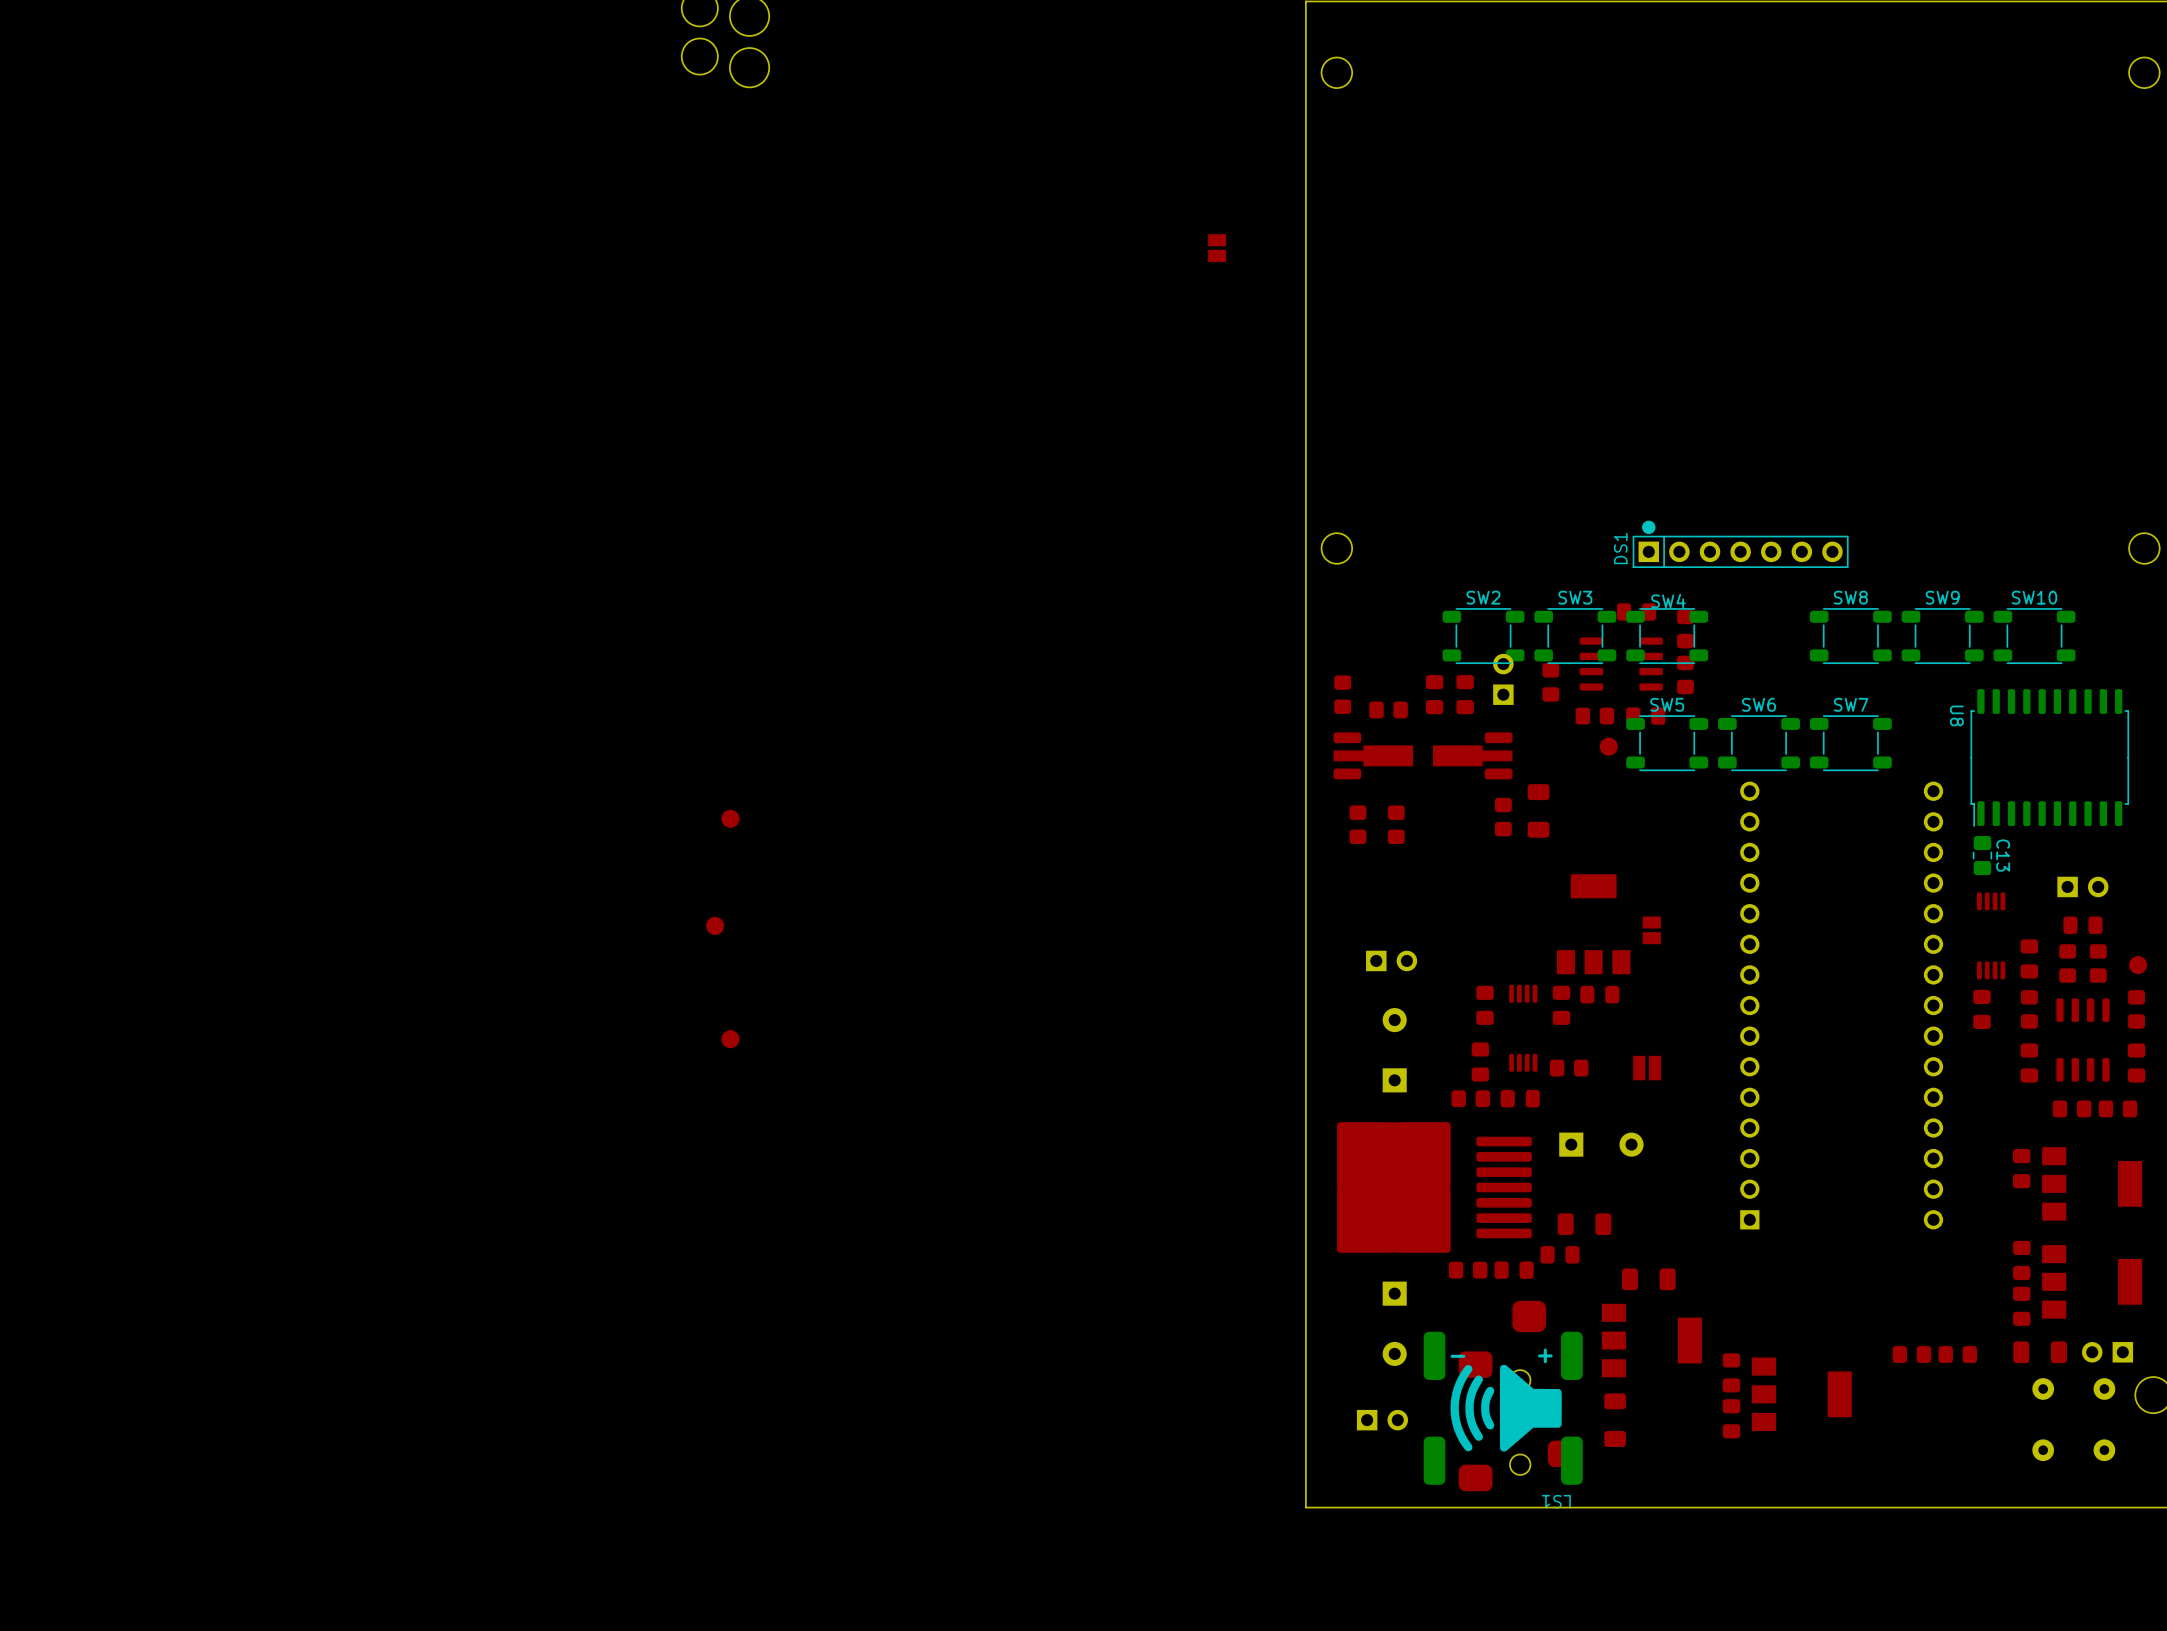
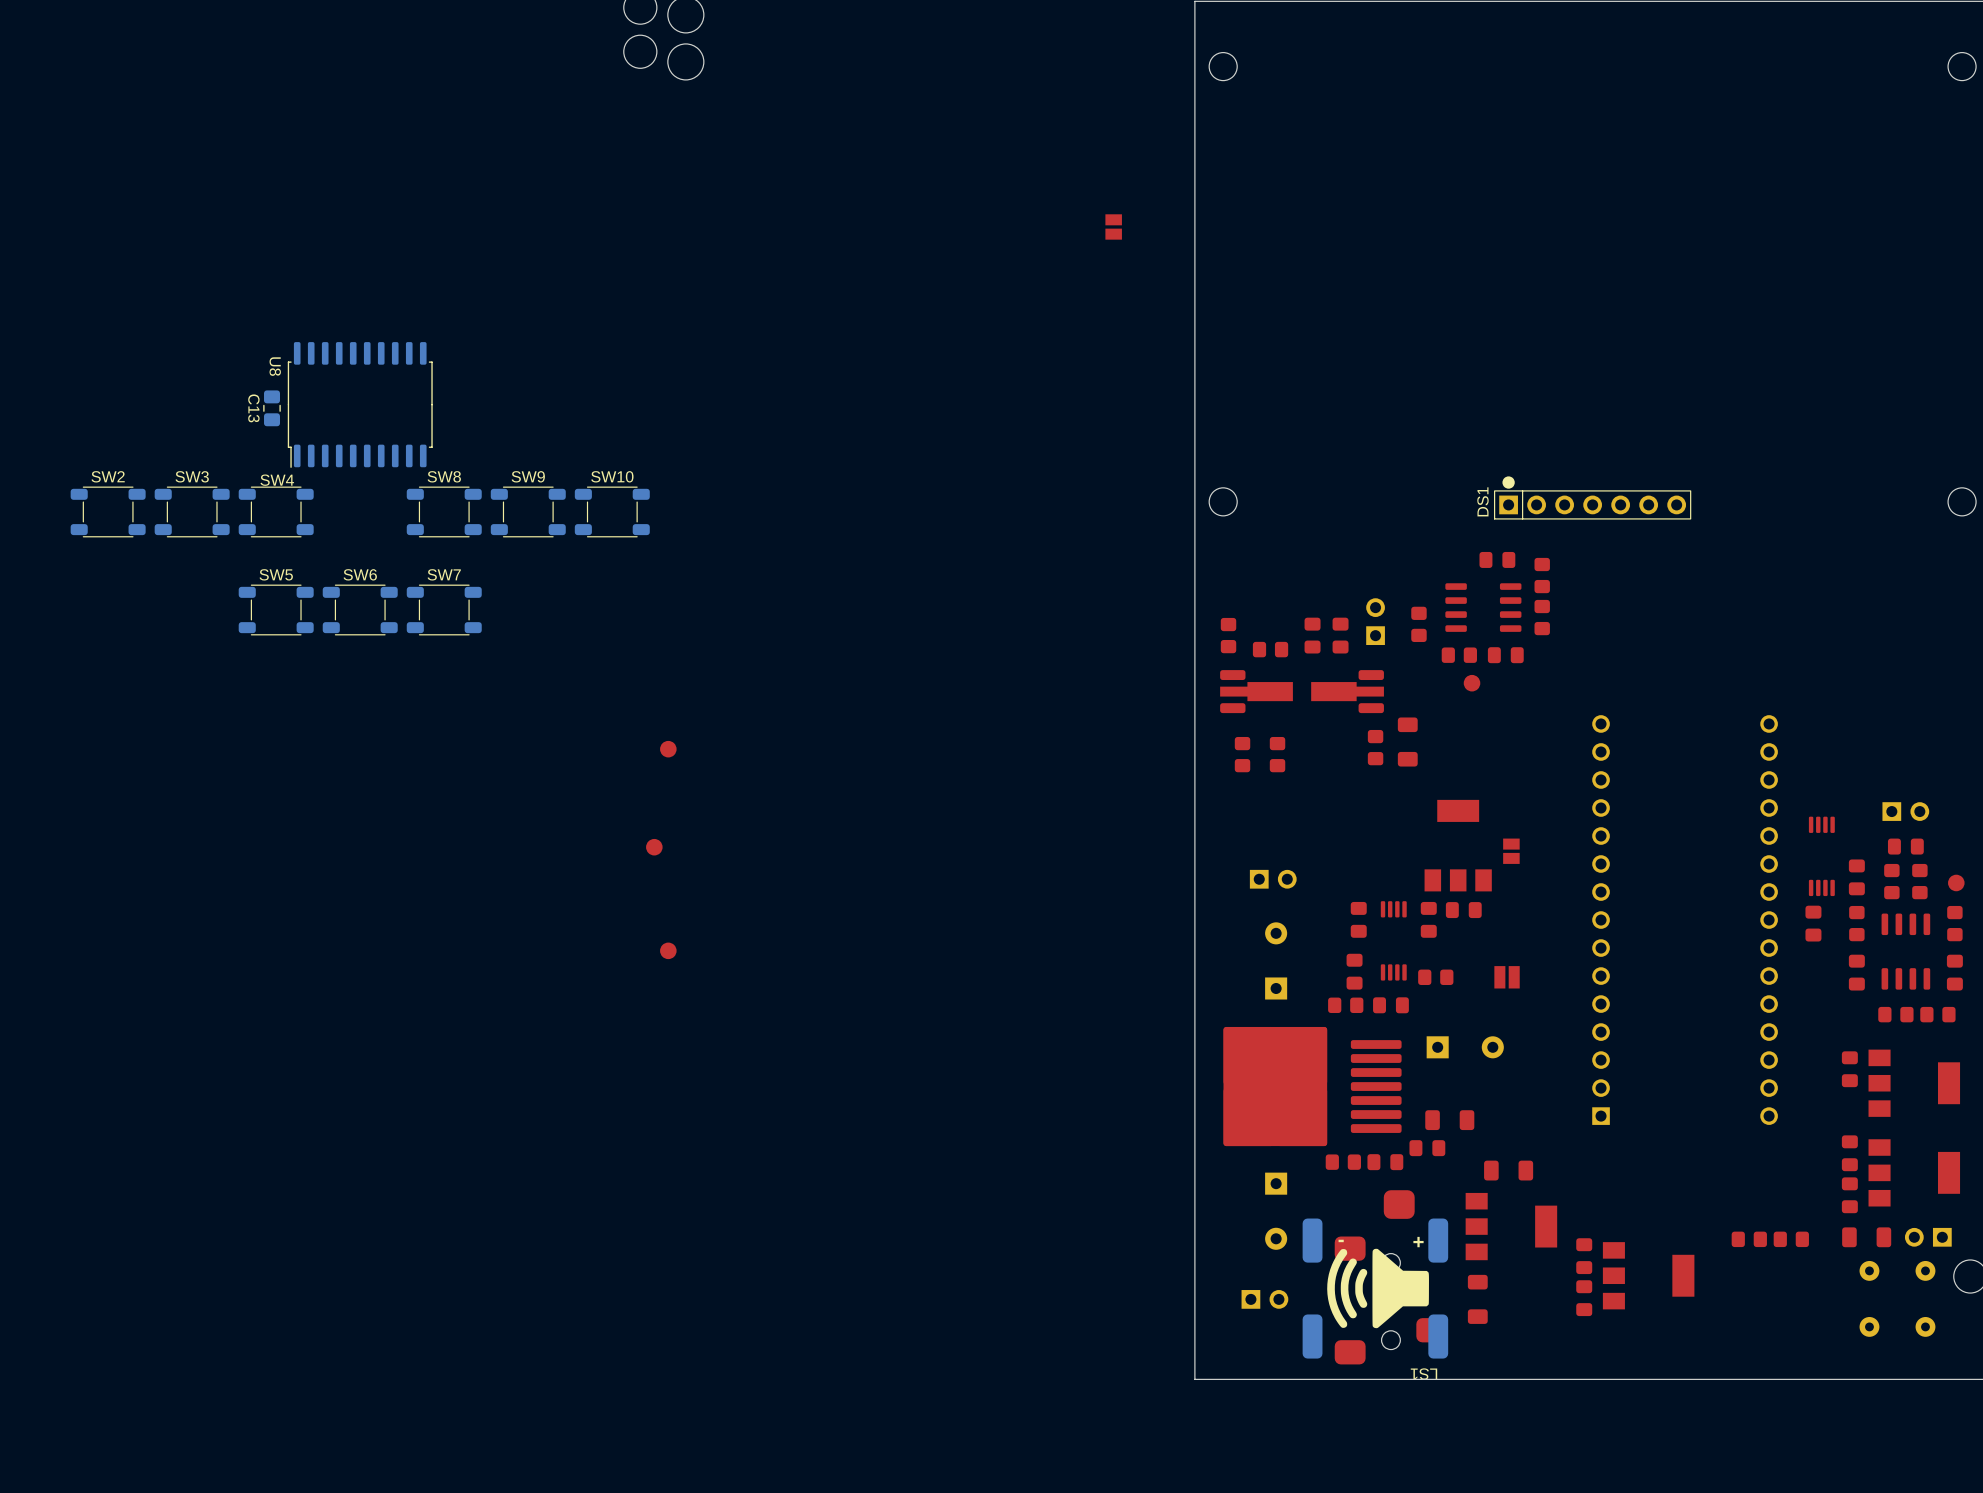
SW2 position: (1483, 636) -> (108, 511)
SW3 position: (1575, 636) -> (192, 511)
SW4 position: (1667, 636) -> (276, 511)
SW8 position: (1850, 636) -> (444, 511)
SW9 position: (1942, 636) -> (528, 511)
SW10 position: (2034, 636) -> (612, 511)
SW5 position: (1667, 743) -> (276, 609)
SW6 position: (1758, 743) -> (360, 609)
SW7 position: (1850, 743) -> (444, 609)
U8 position: (2049, 757) -> (360, 405)
C13 position: (1982, 855) -> (272, 408)
C13 name position: C13 (2003, 855) -> C13 (253, 408)

